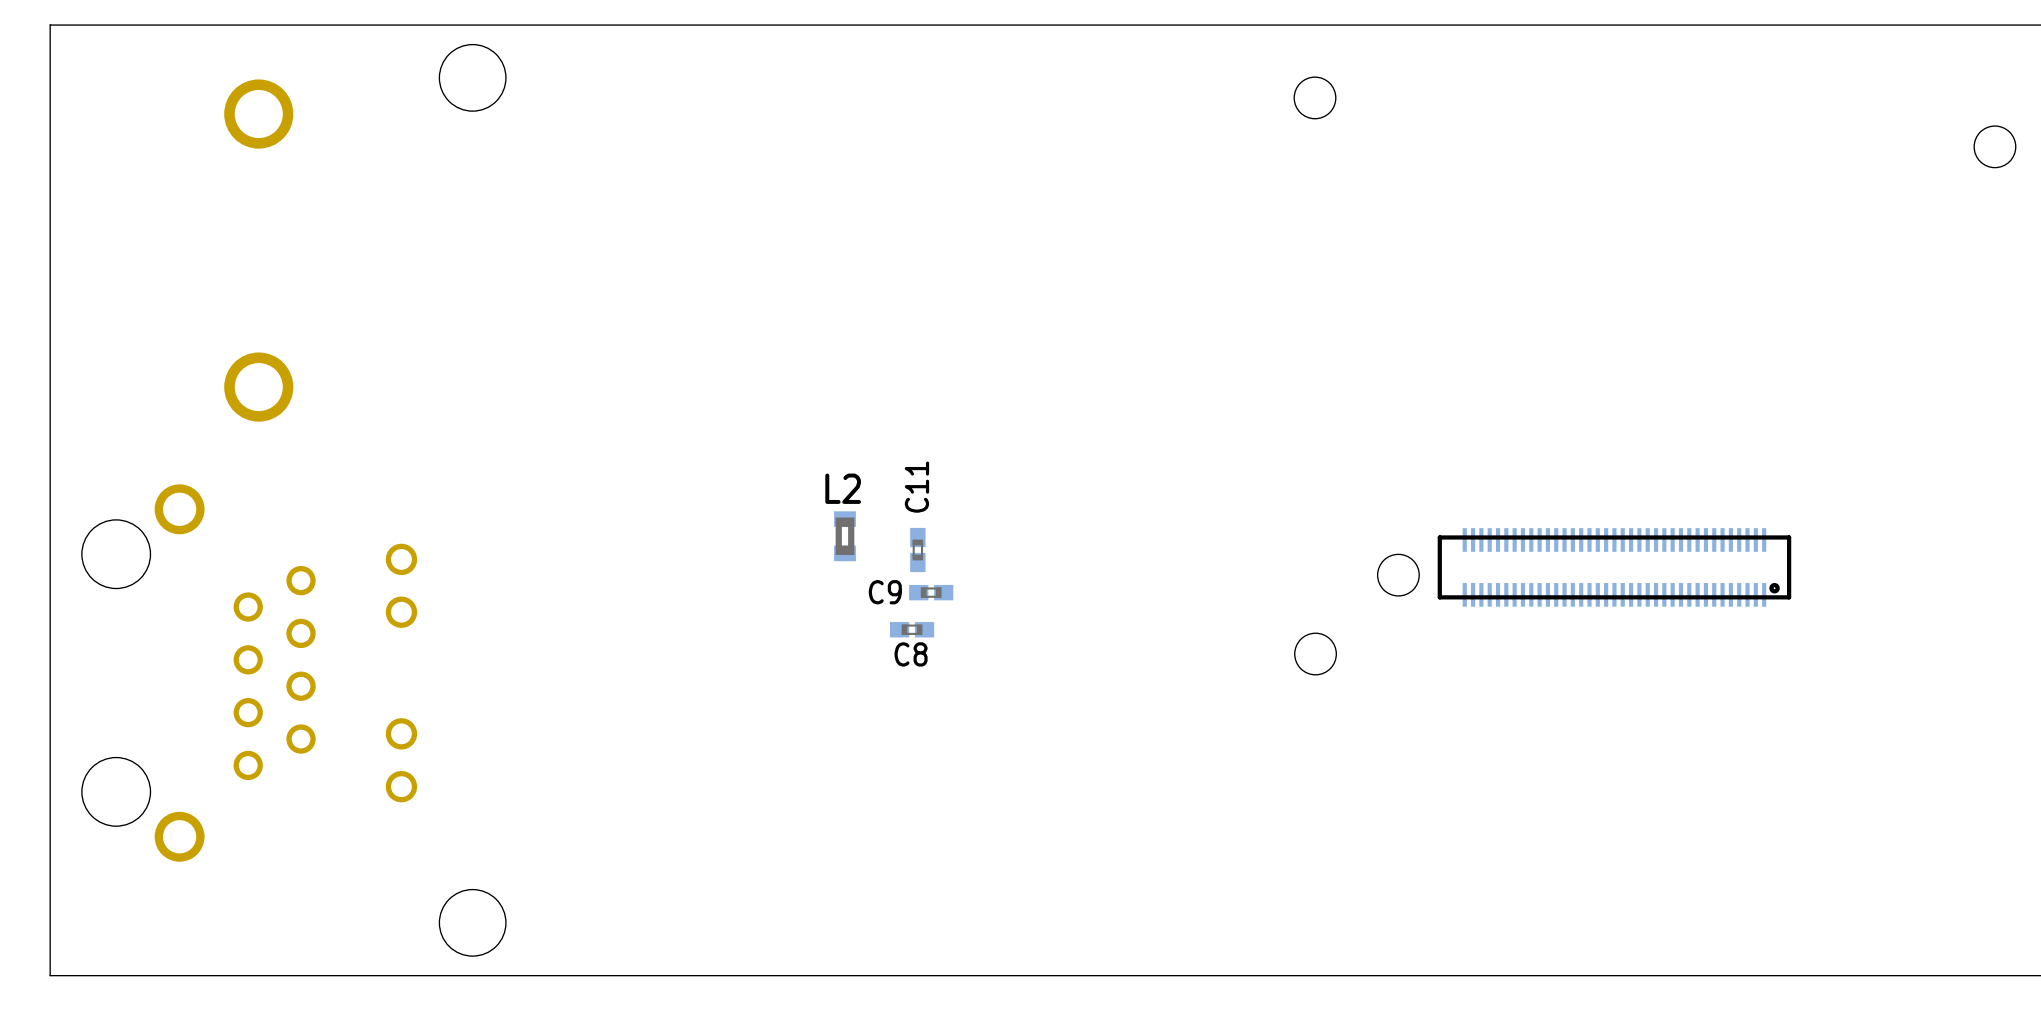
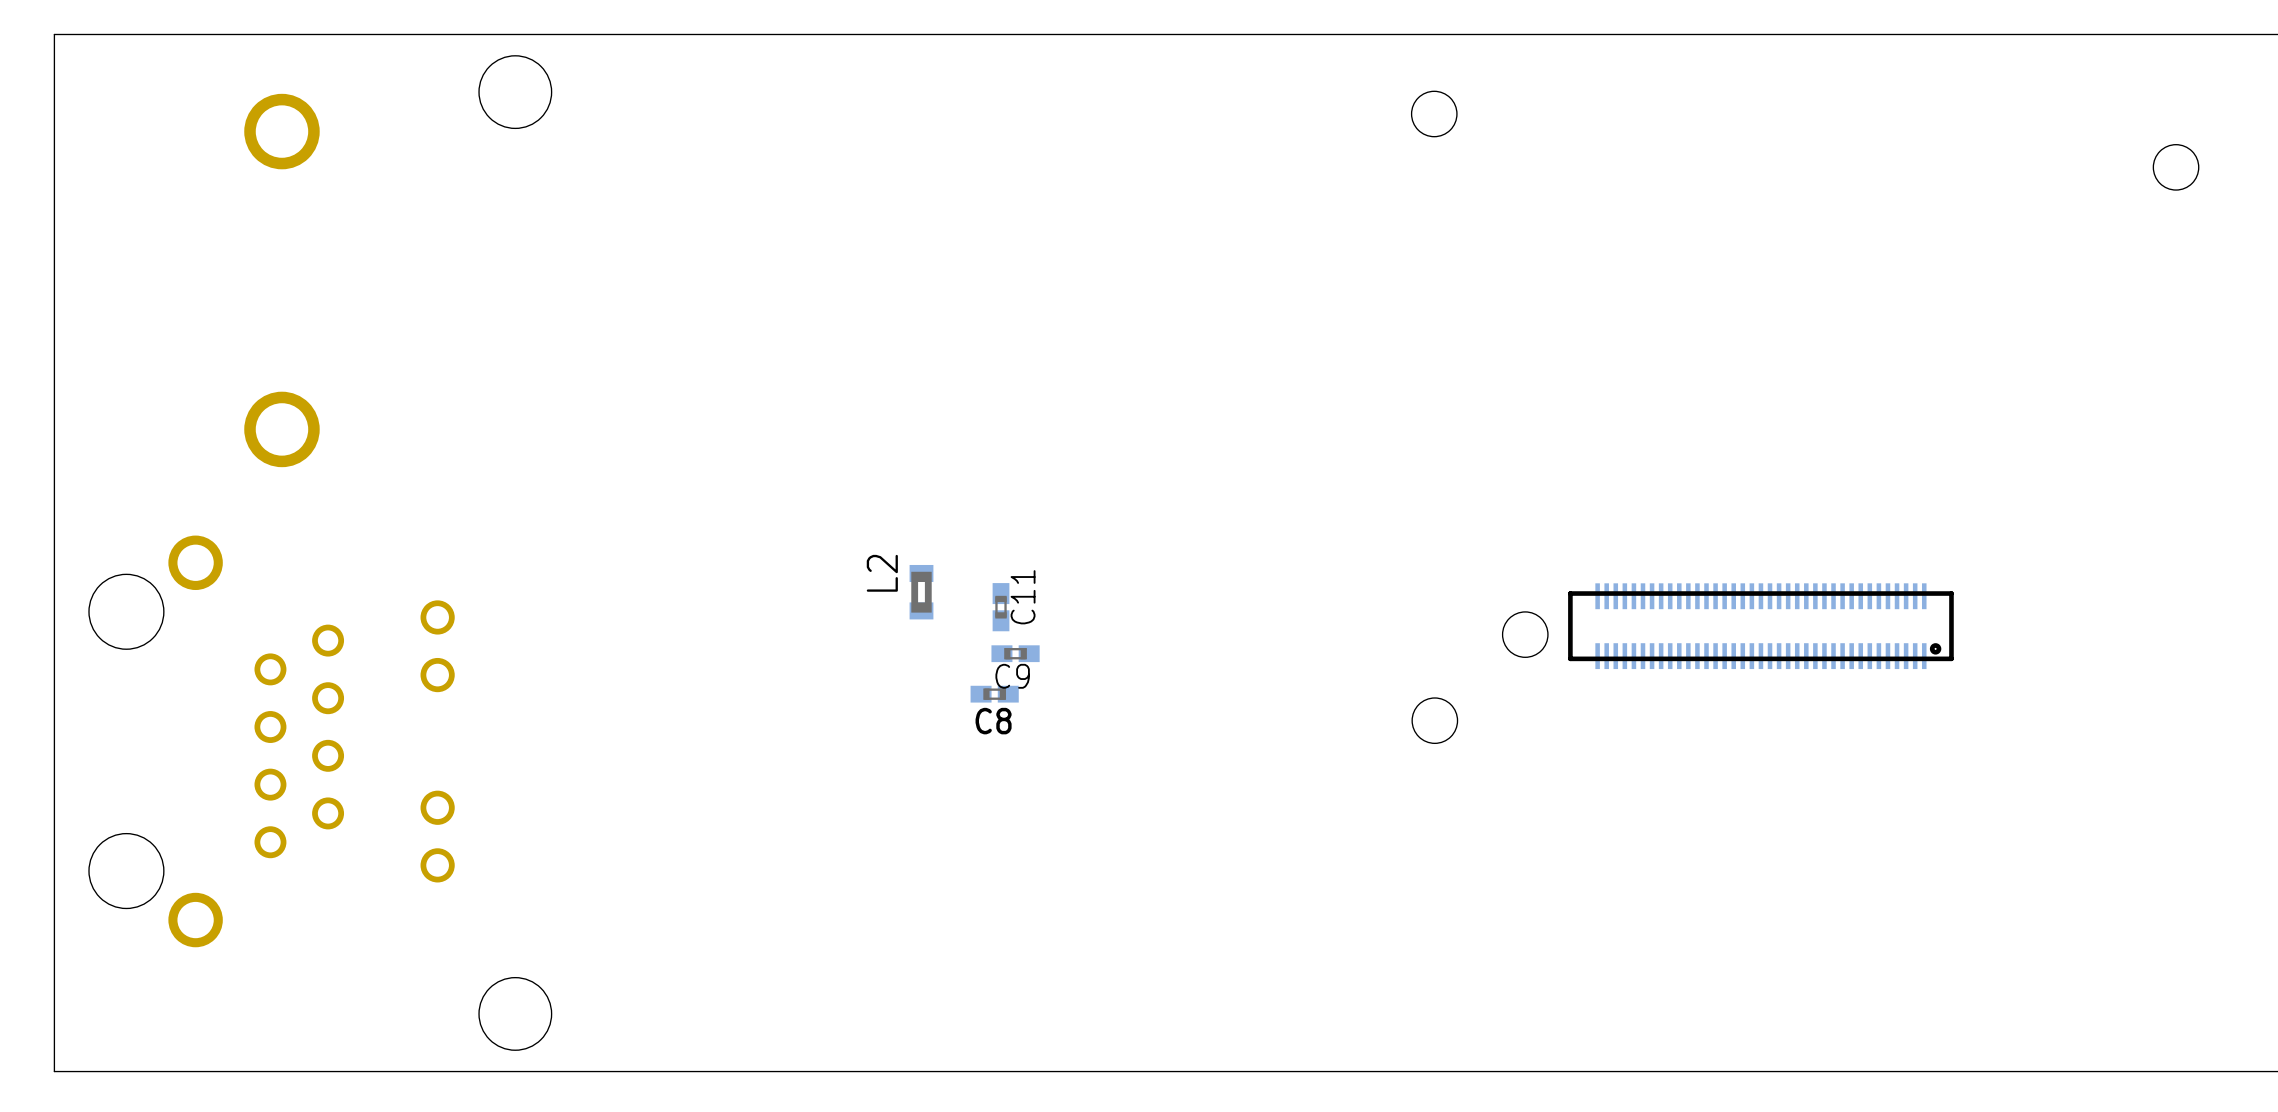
C11 name position: C11 (916, 487) -> C11 (1023, 597)
L2 name rotation: 0° (843, 488) -> 90° counterclockwise (882, 573)
C9 name position: C9 (885, 592) -> C9 (1012, 676)

